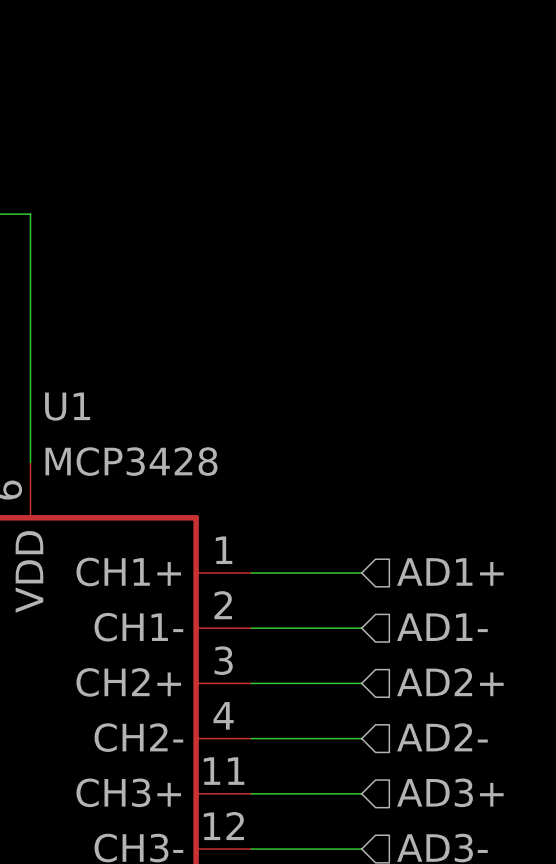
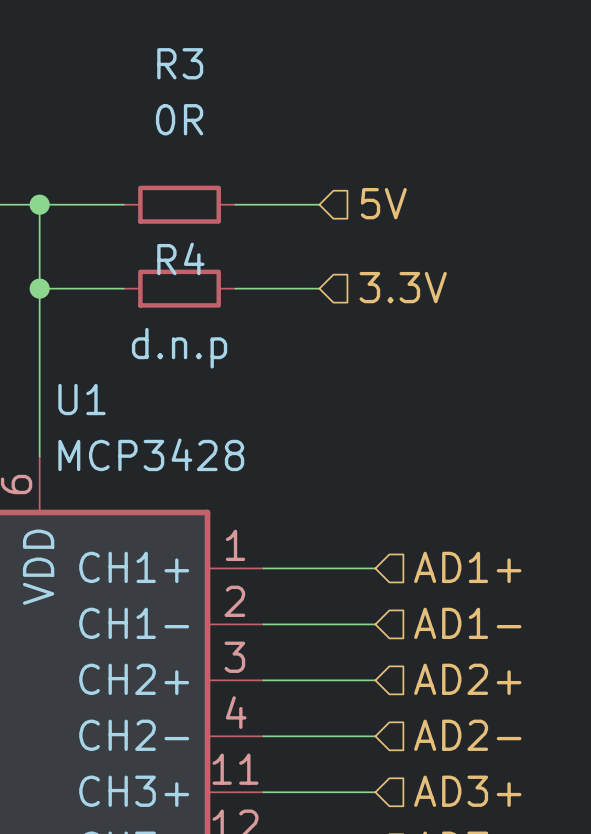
hierarchical label: none -> 5V (383, 203)
wire: none -> (39, 204) (123, 204)
junction: none -> (39, 204)
R3: none -> 0R (179, 204)
wire: none -> (235, 204) (319, 204)
hierarchical label: none -> 3.3V (403, 287)
wire: none -> (39, 288) (123, 288)
junction: none -> (39, 288)
R4: none -> d.n.p (179, 288)
wire: none -> (235, 288) (319, 288)

